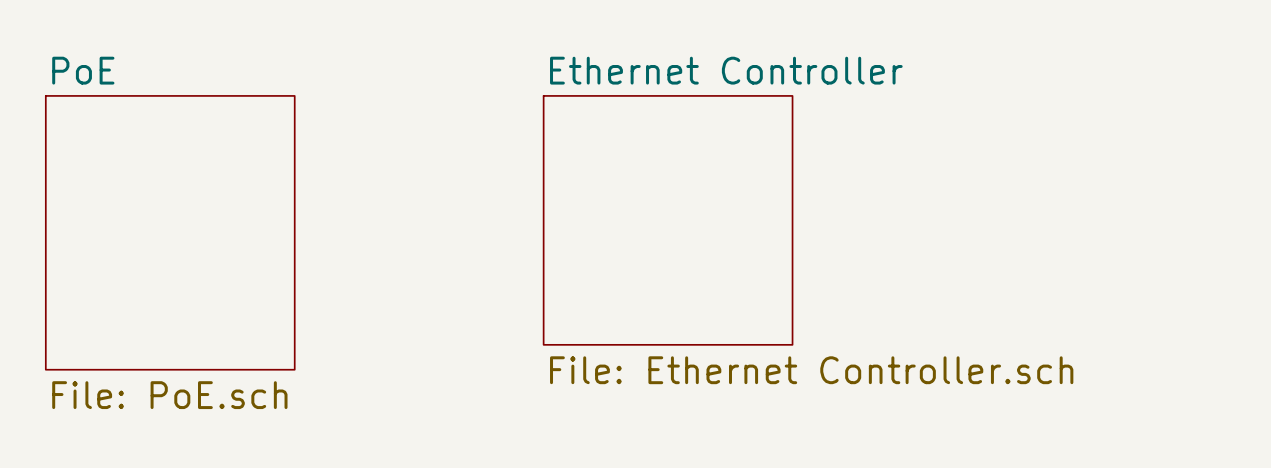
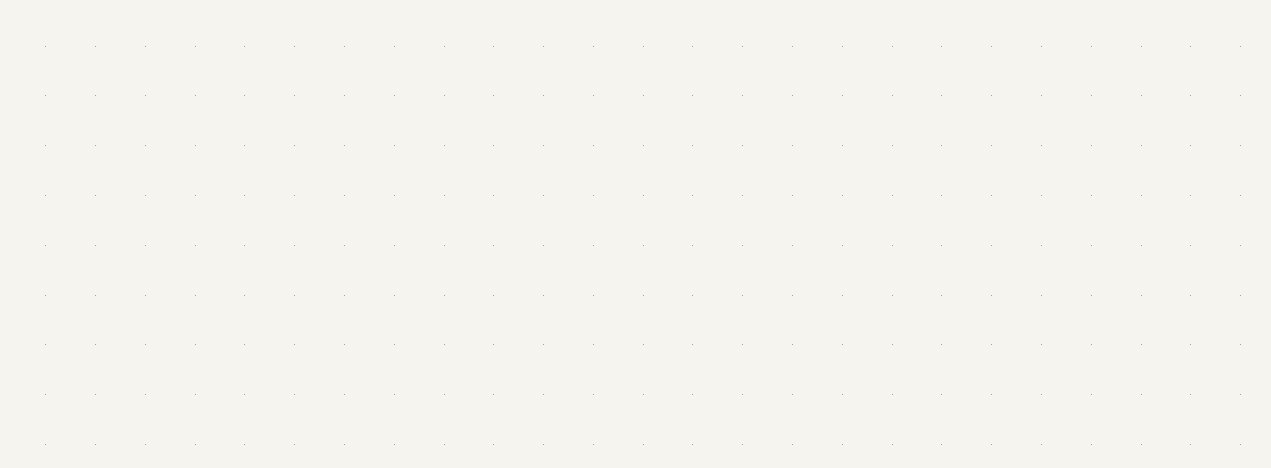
sheet Ethernet Controller: File: Ethernet Controller.sch (668, 220) -> none
sheet PoE: File: PoE.sch (170, 232) -> none

